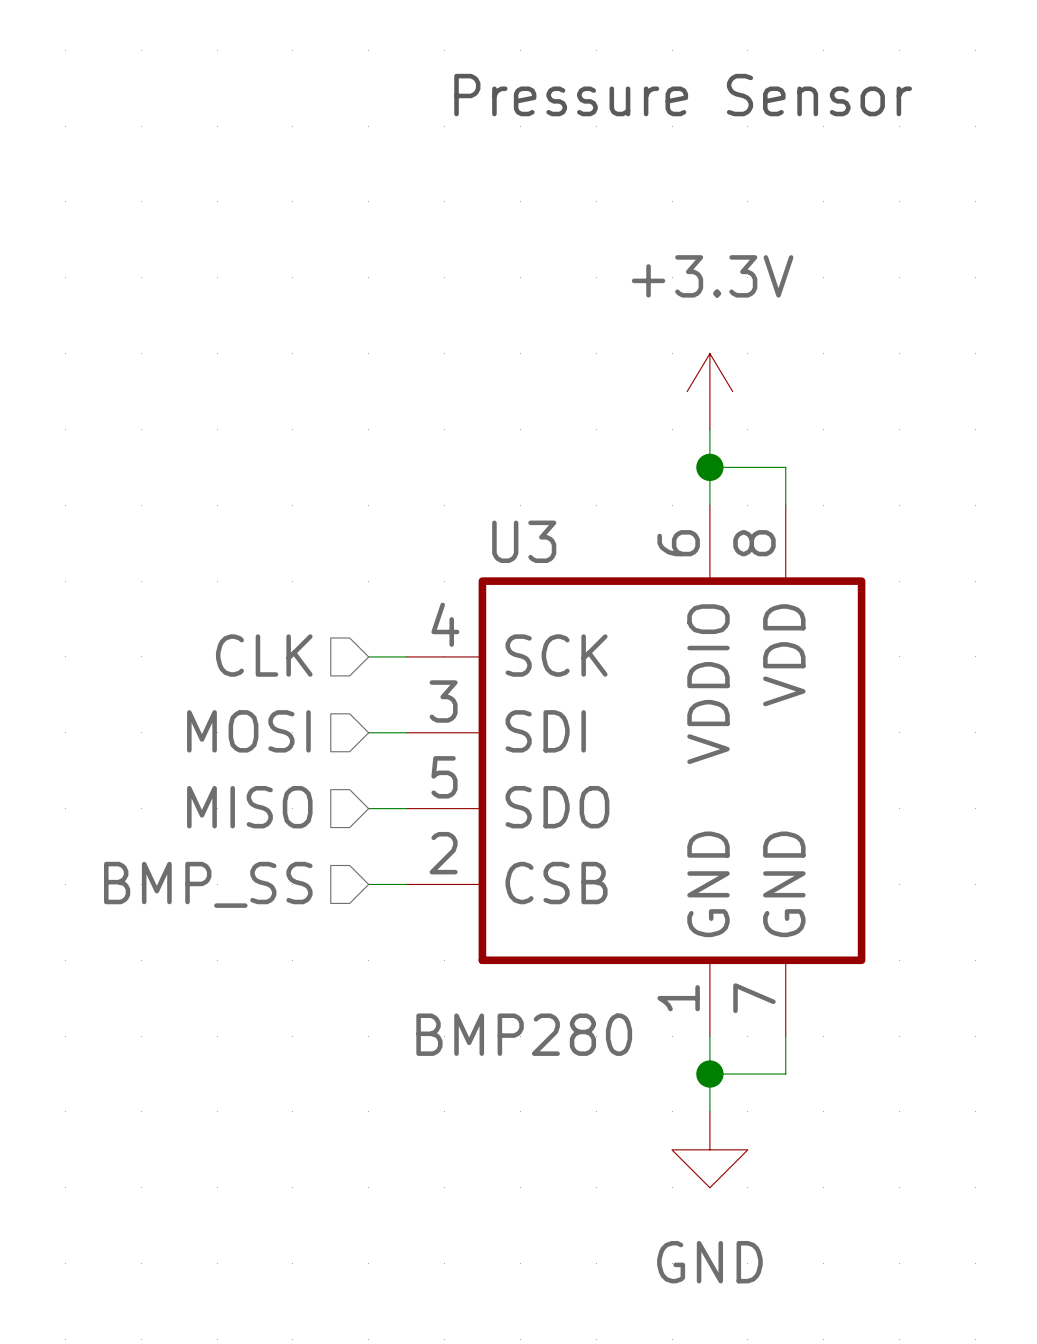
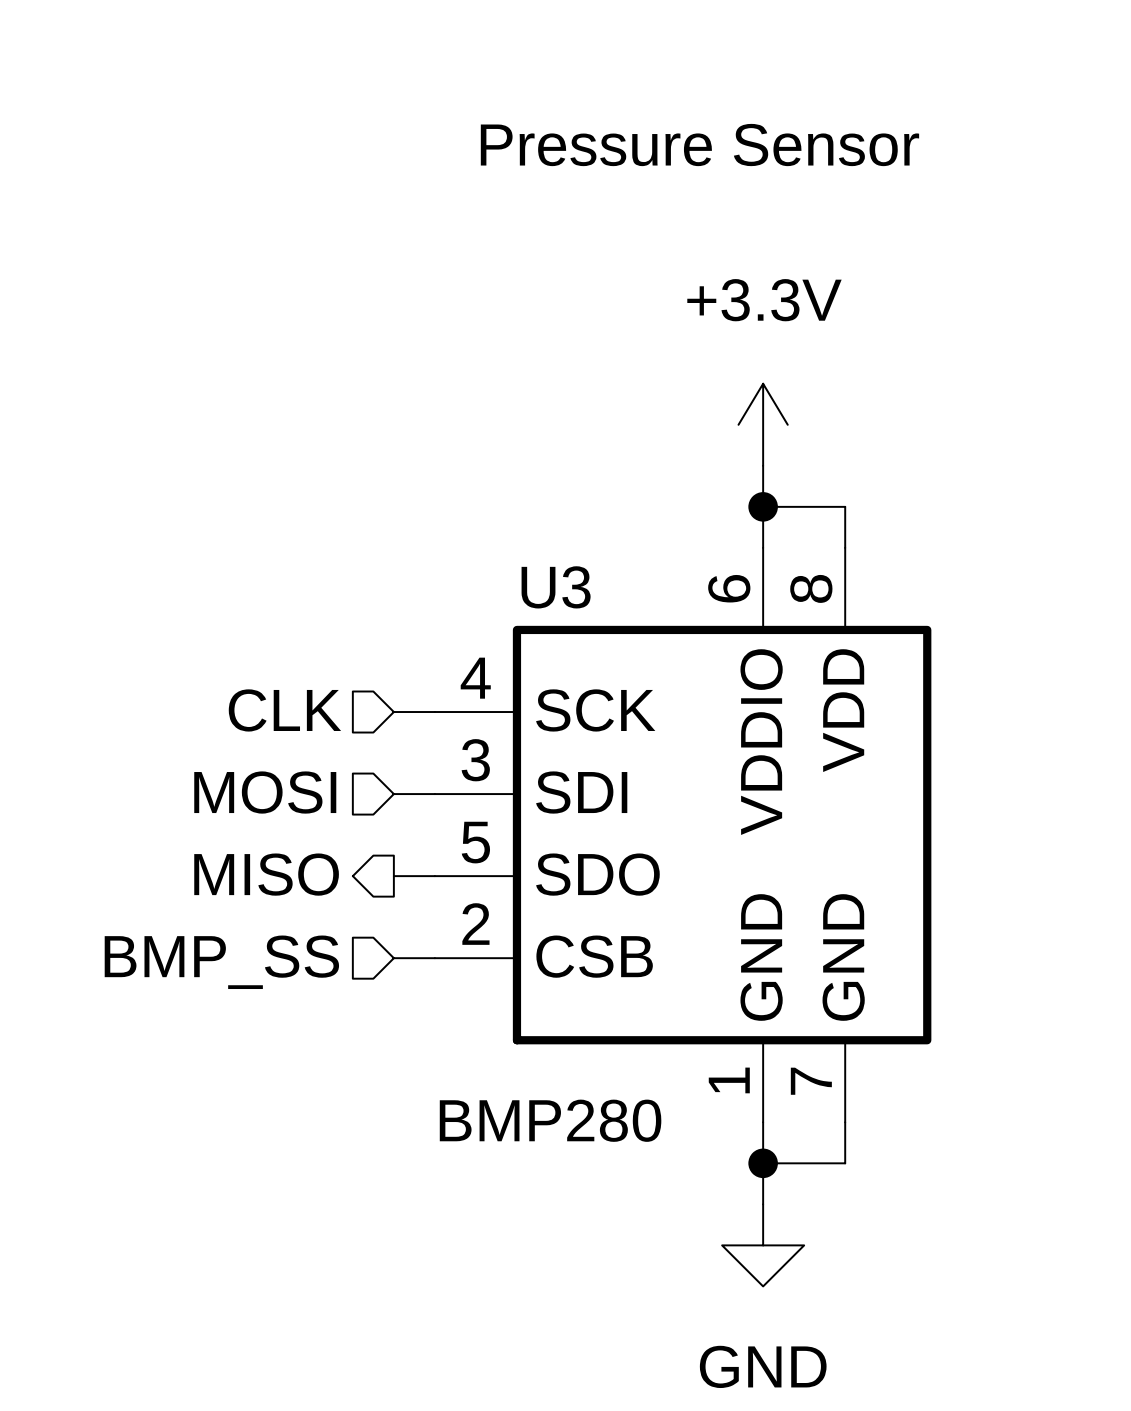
text position: Pressure Sensor (683, 95) -> Pressure Sensor (699, 145)
hierarchical label shape: input (249, 807) -> output (266, 874)

